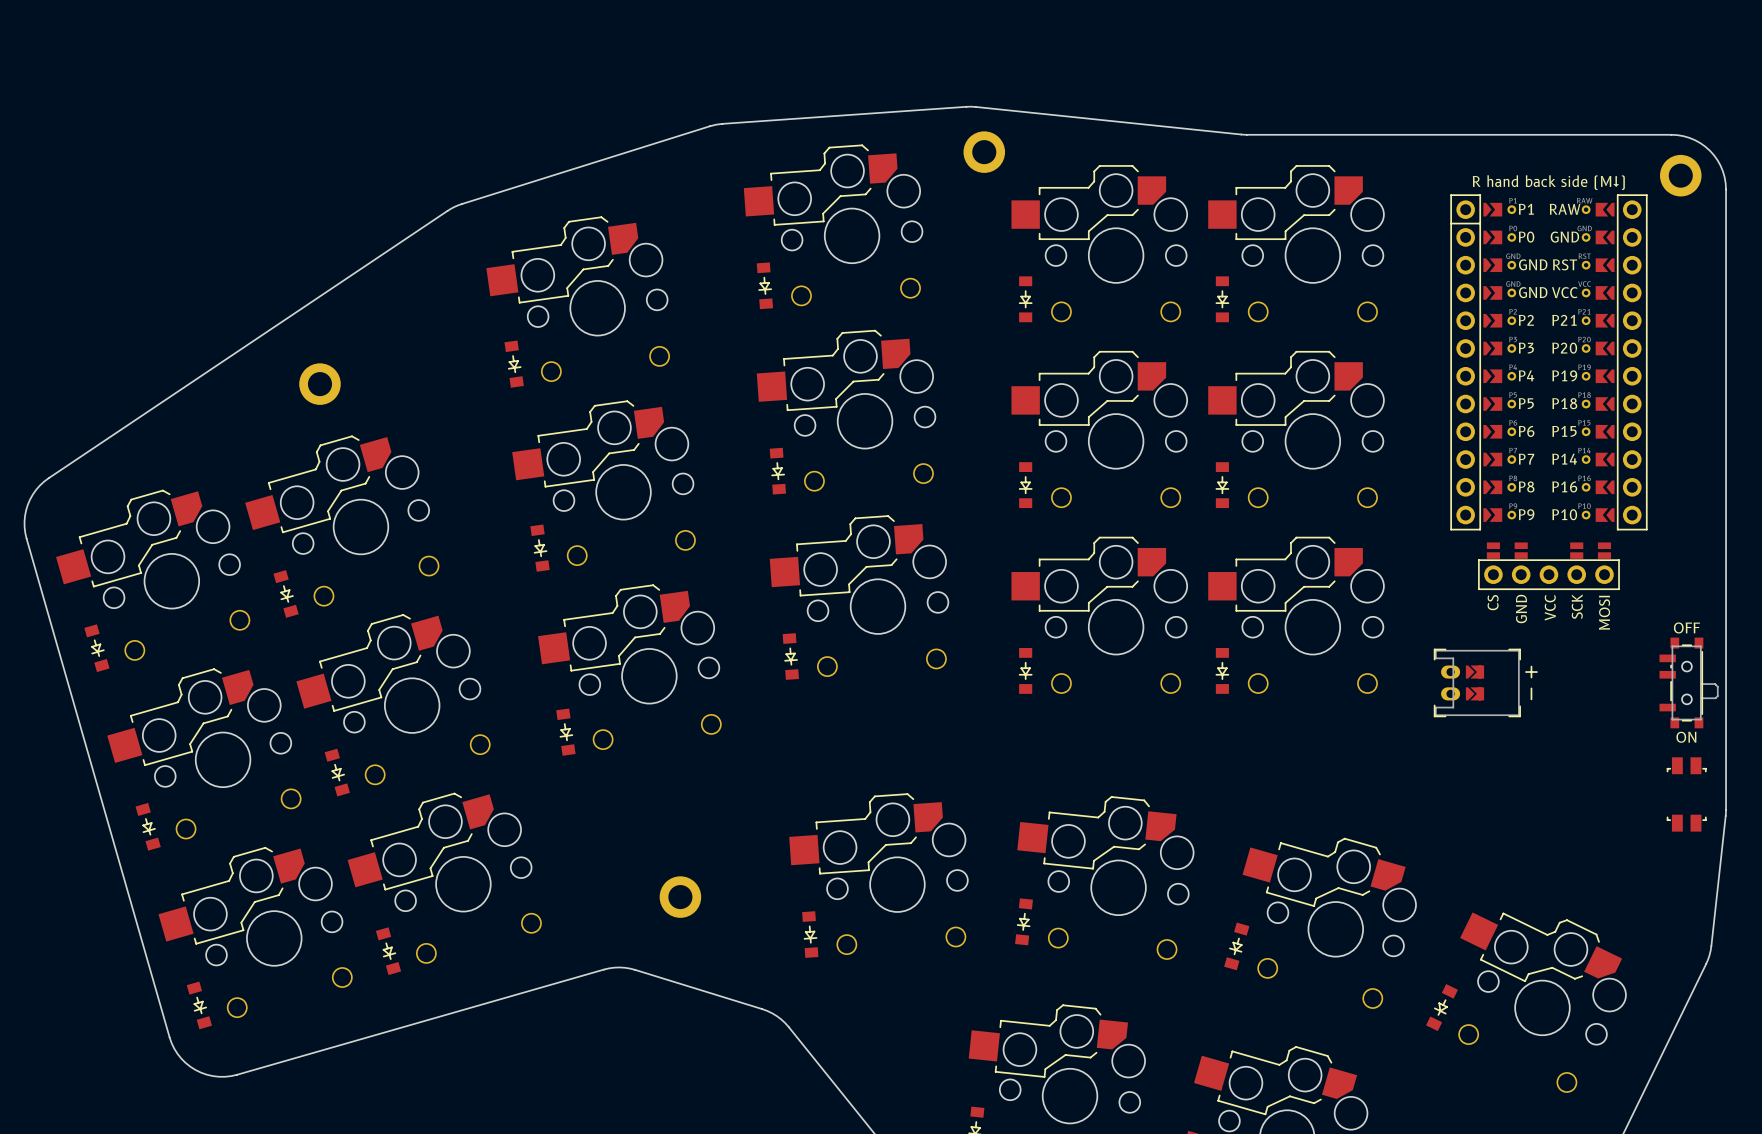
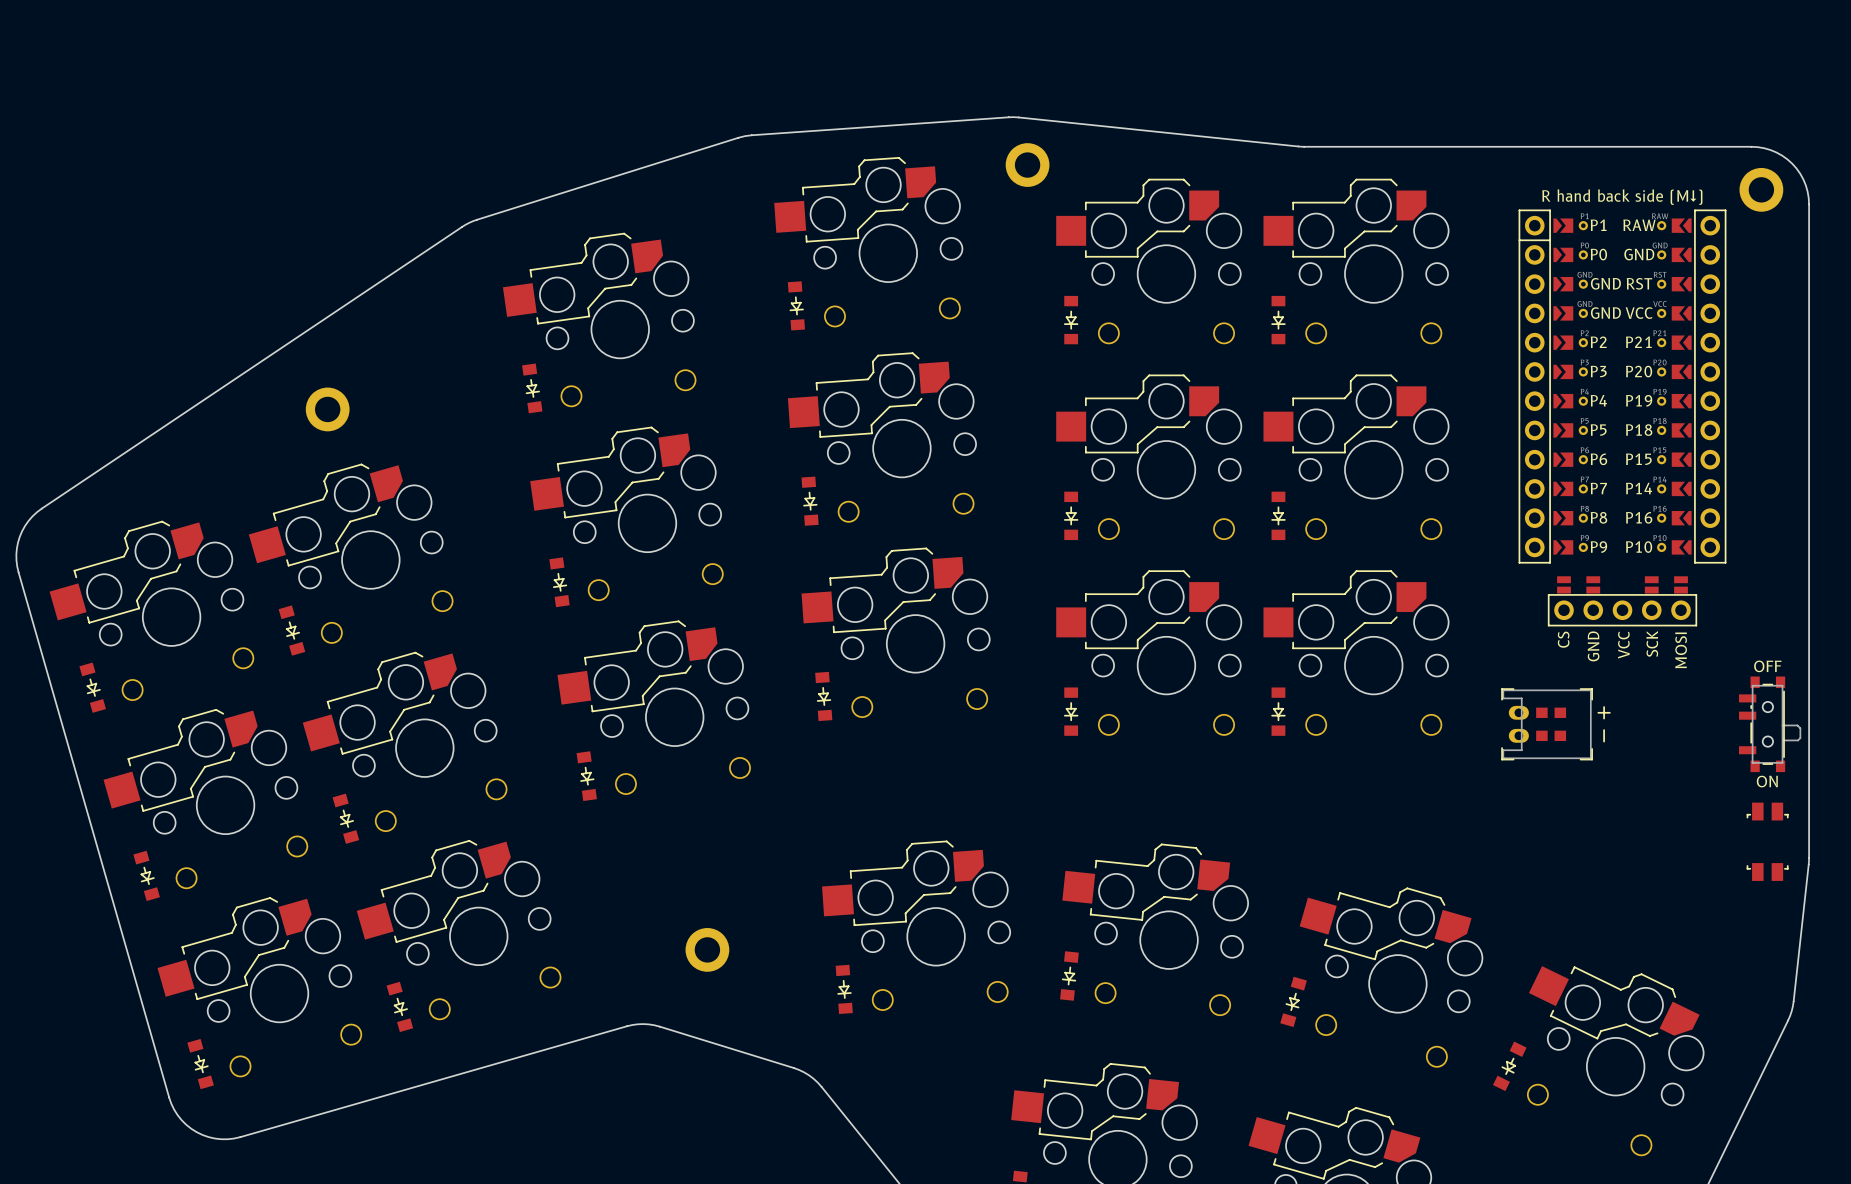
part footprint: [1433, 648, 1538, 718] -> [1501, 688, 1611, 761]

